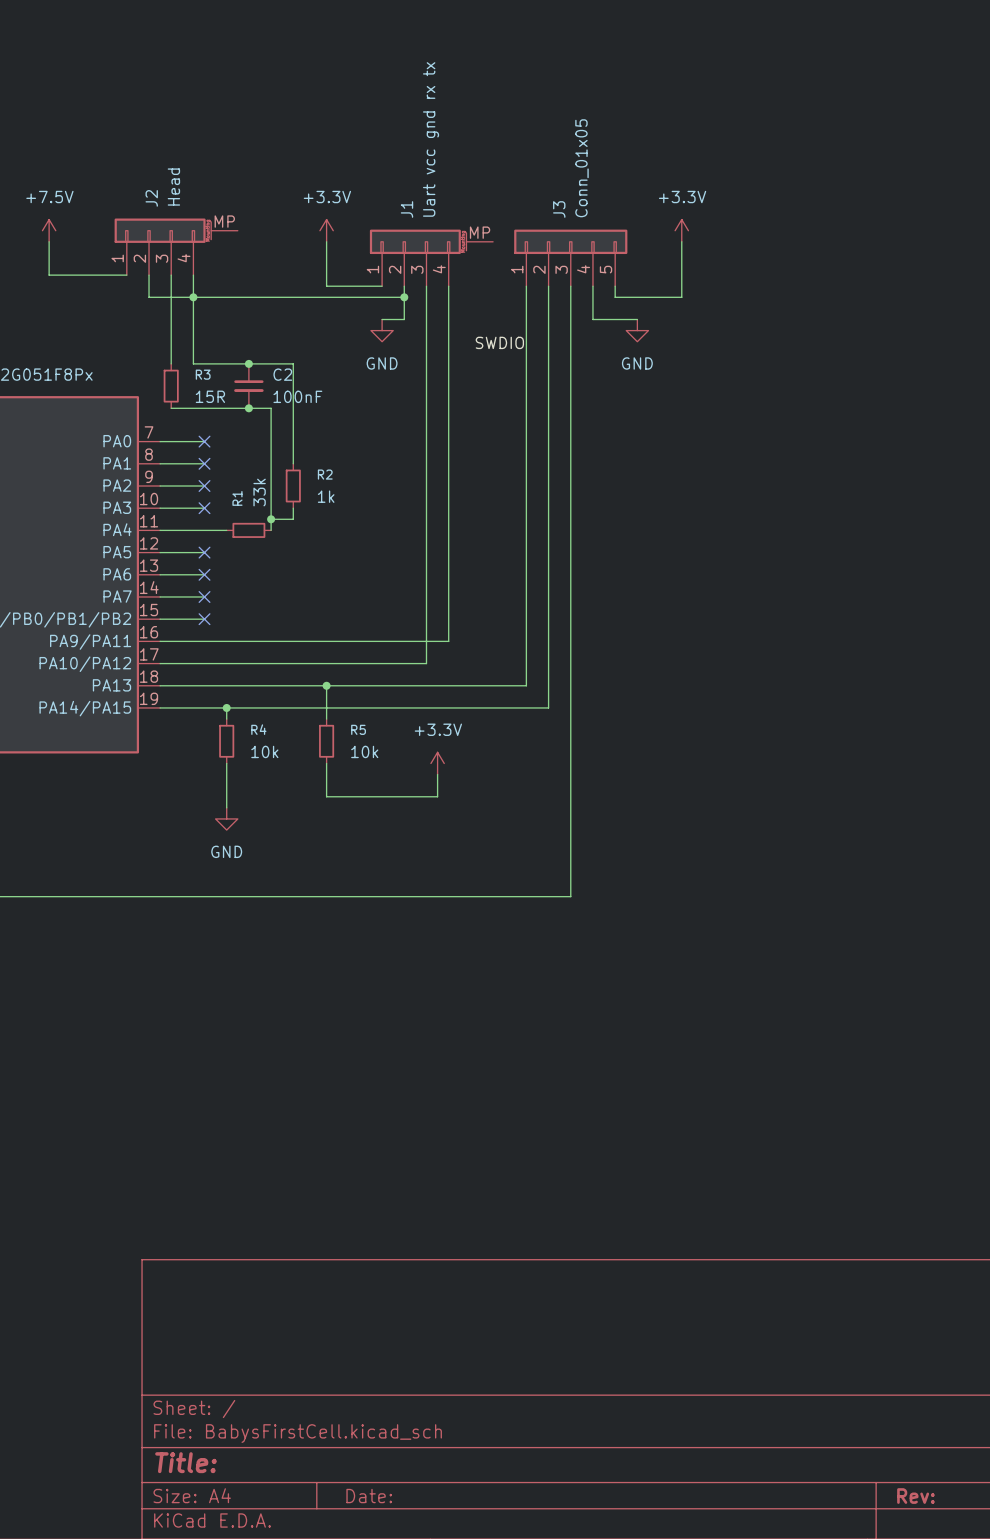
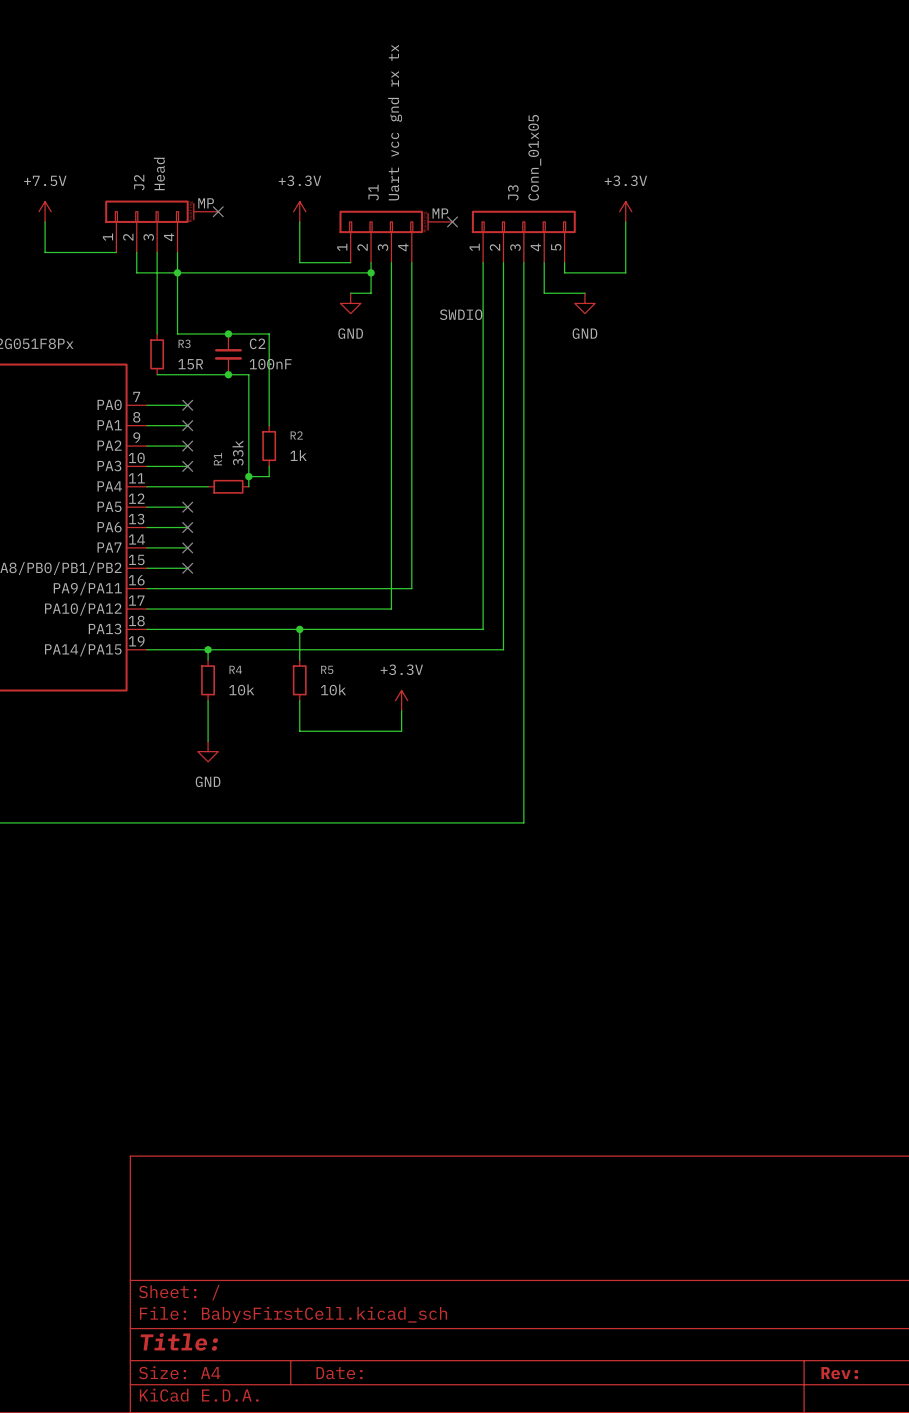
no-connect mark: none -> (218, 211)
no-connect mark: none -> (452, 221)

